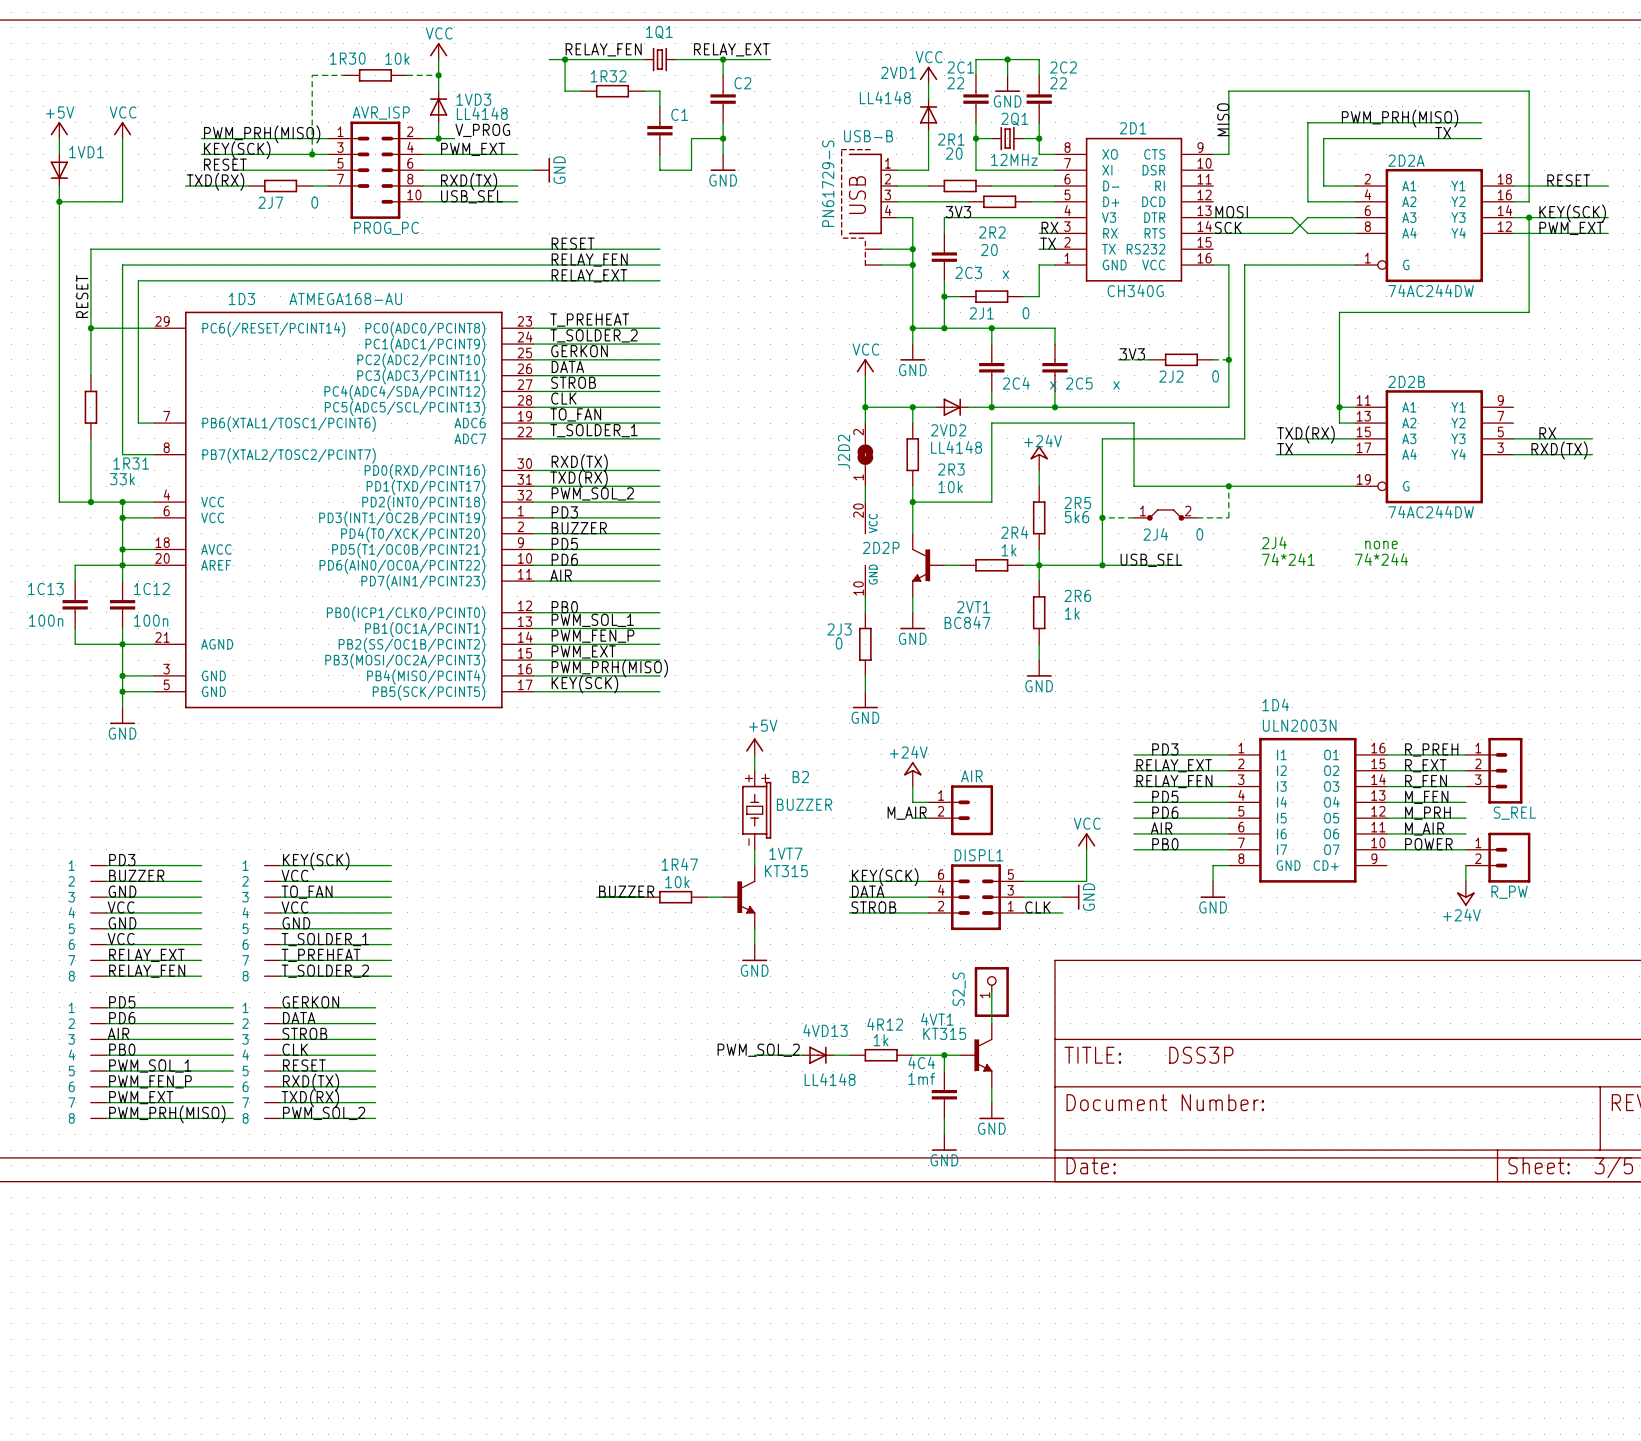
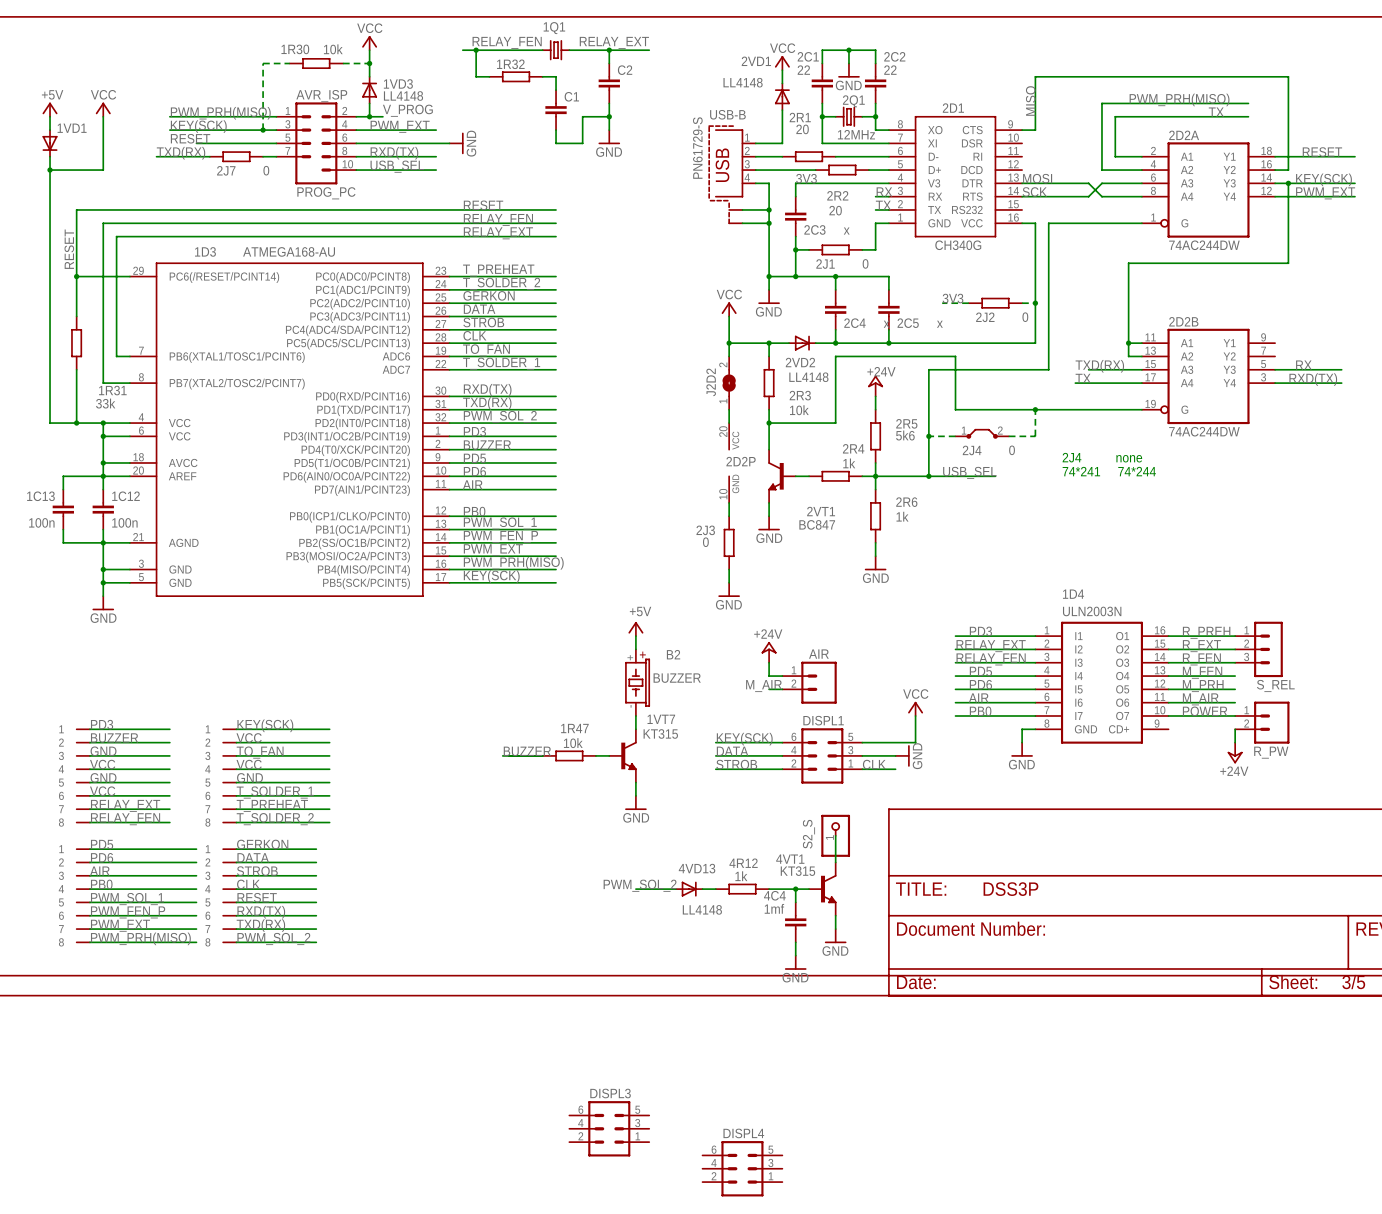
DISPL3: none -> (609, 1128)
DISPL4: none -> (742, 1168)

